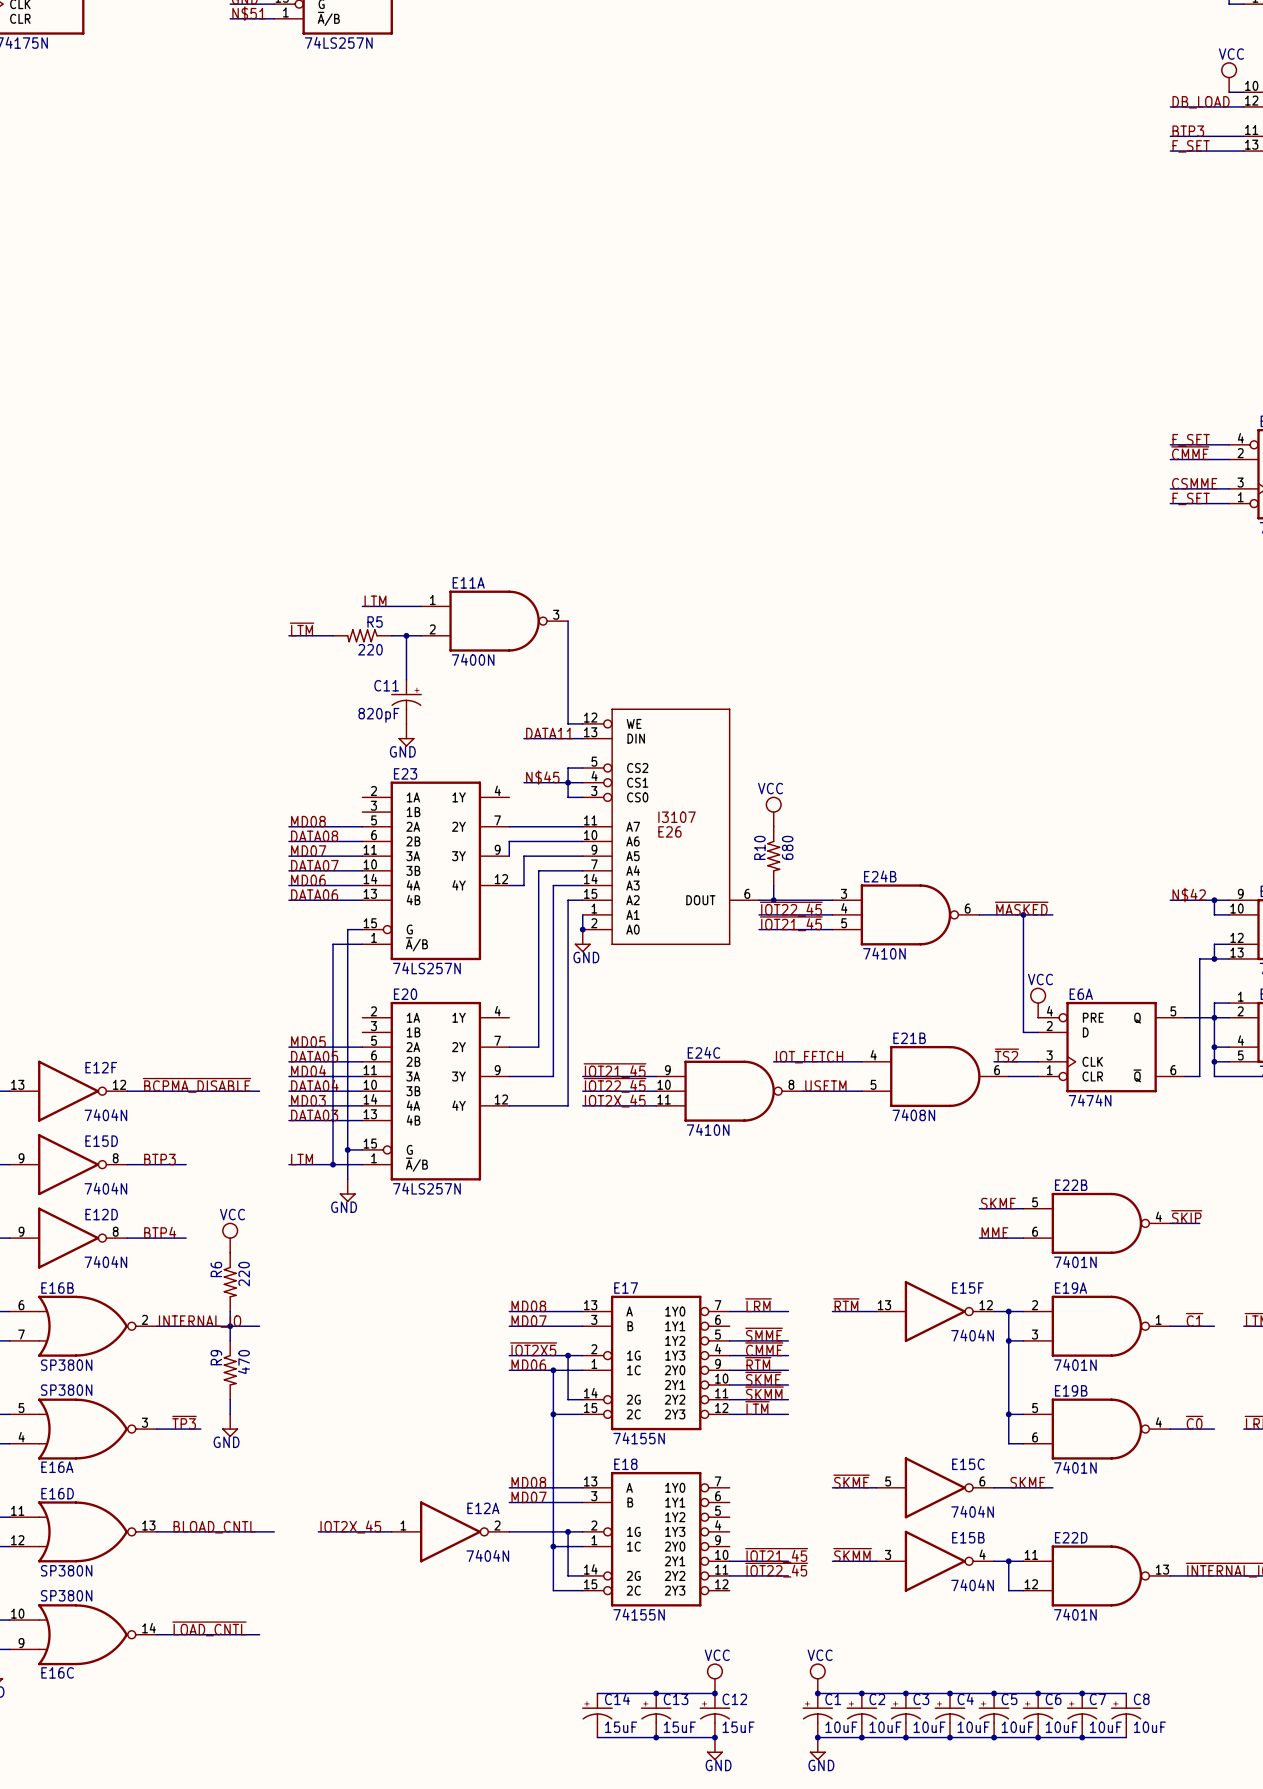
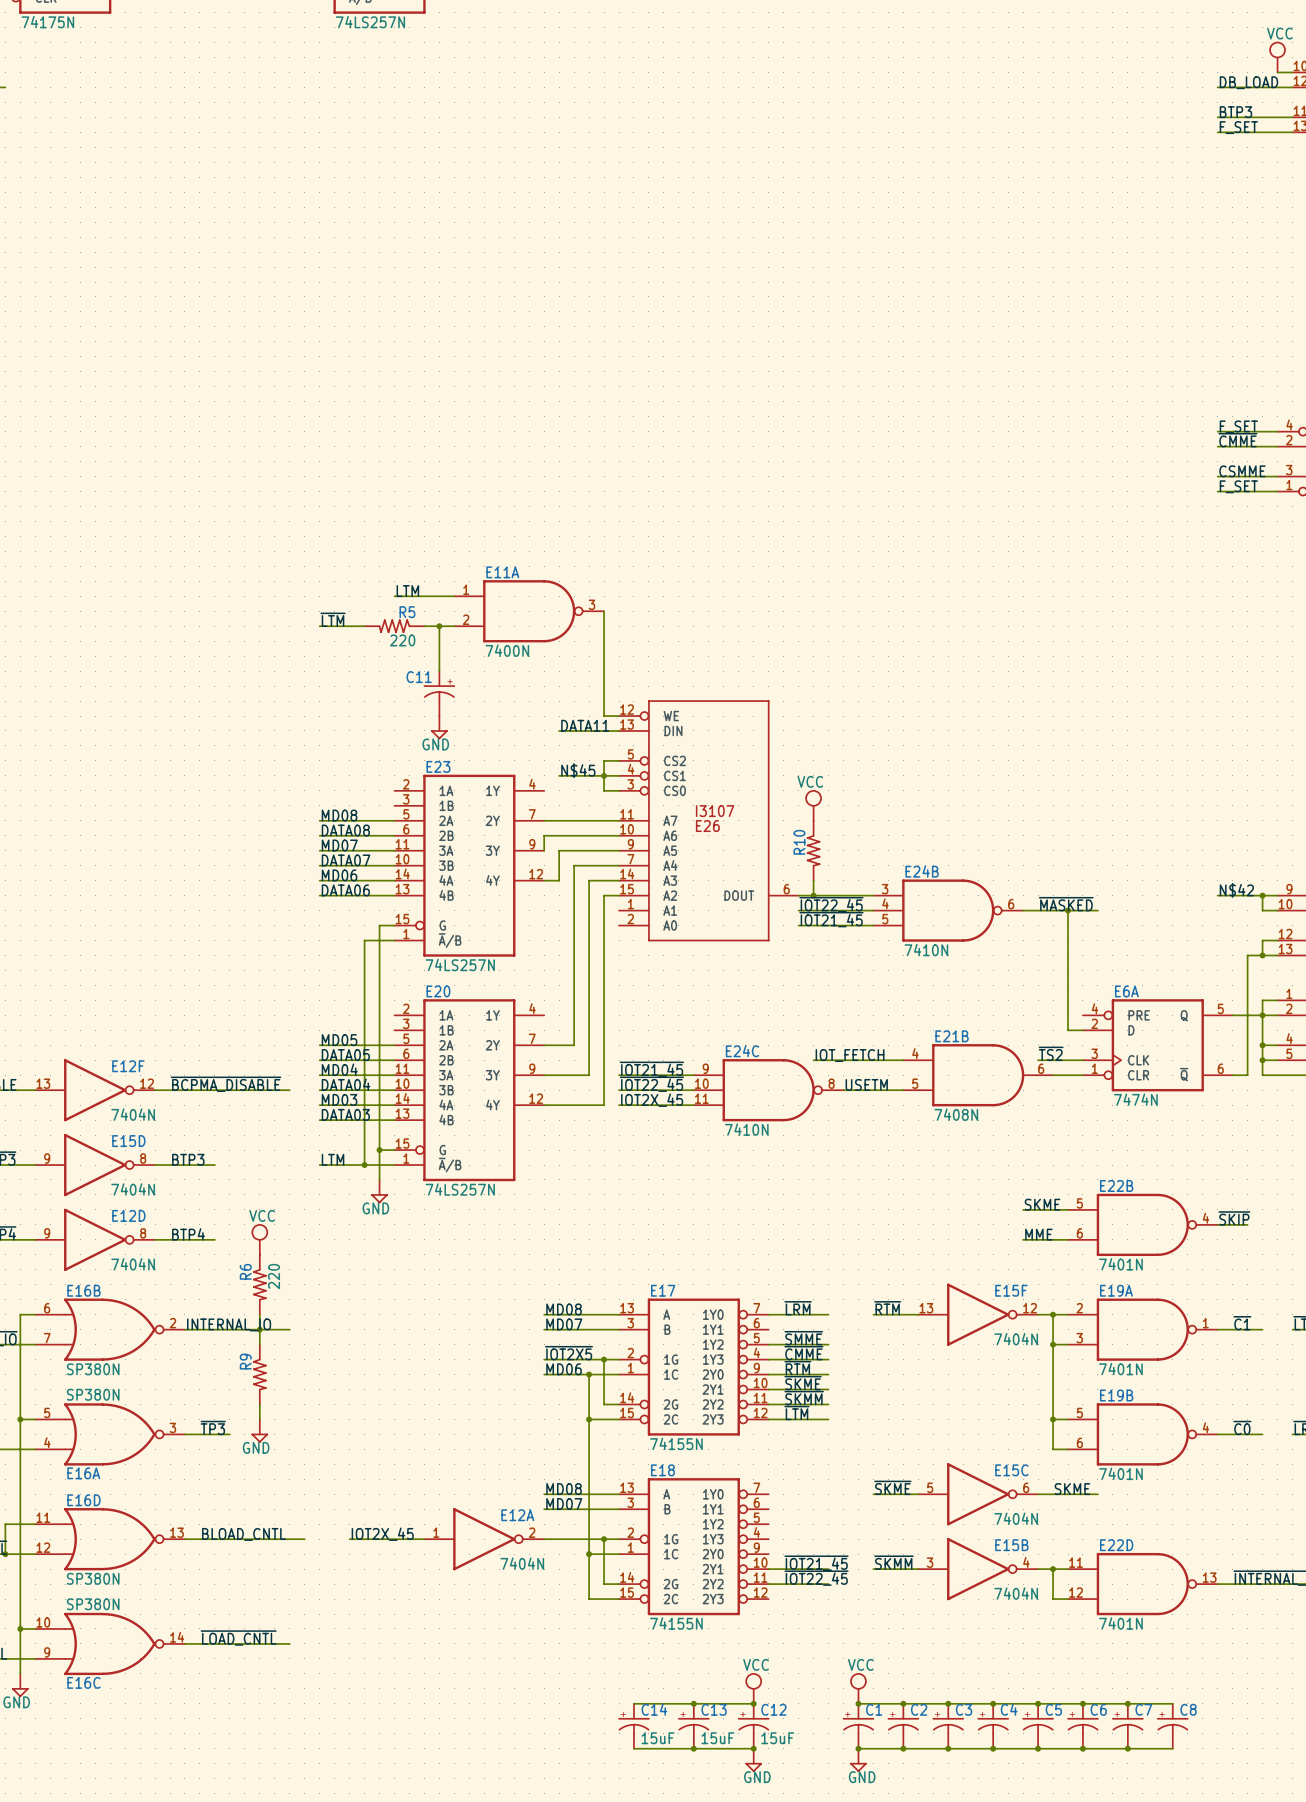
C11 value: 820pF (378, 715) -> none
R10 value: 680 (787, 847) -> none
wire: (582, 914) (582, 929) -> none
junction: (582, 929) -> none
power symbol: GND (582, 940) -> none
power symbol: VCC (1038, 1002) -> none
R9 value: 470 (243, 1362) -> none
C1 value: 10uF (841, 1727) -> none
C2 value: 10uF (885, 1727) -> none
C3 value: 10uF (929, 1727) -> none
C4 value: 10uF (973, 1727) -> none
C5 value: 10uF (1017, 1727) -> none
C6 value: 10uF (1061, 1727) -> none
C7 value: 10uF (1105, 1727) -> none
C8 value: 10uF (1149, 1727) -> none

